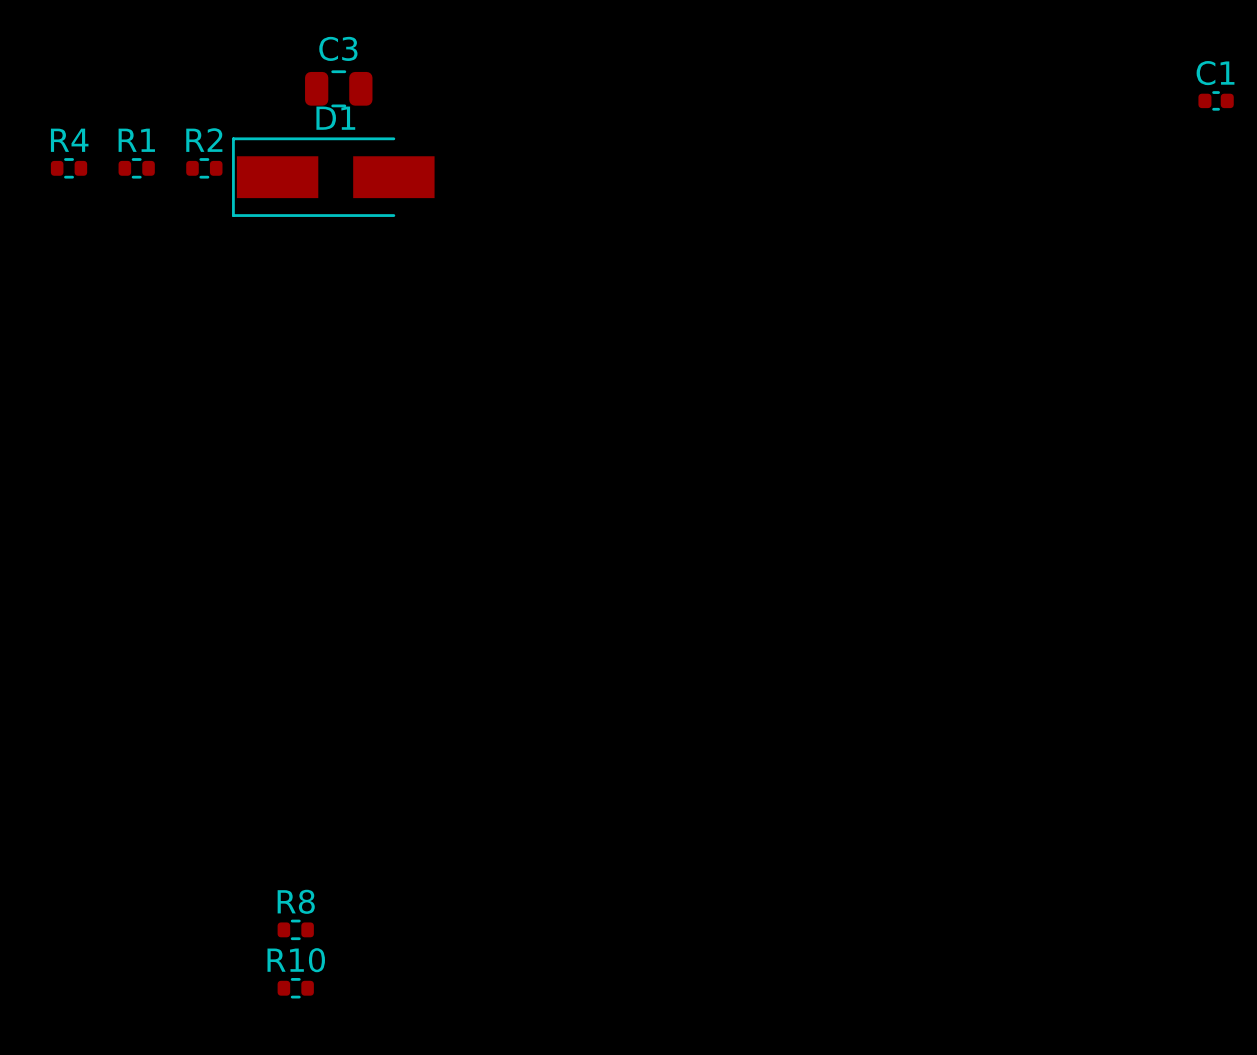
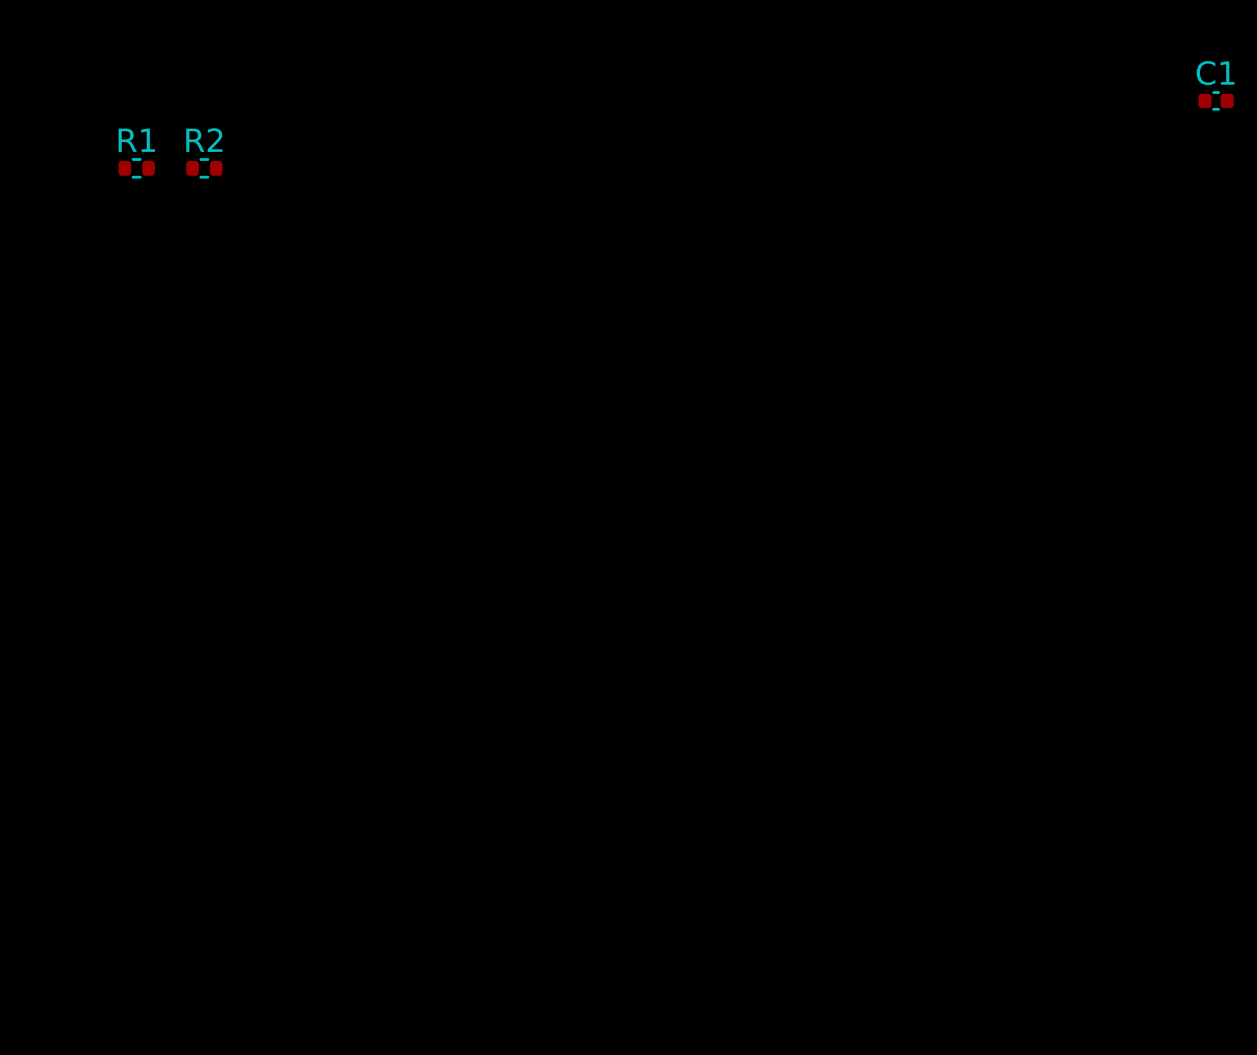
C3: (338, 88) -> none
R4: (69, 168) -> none
D1: (333, 177) -> none
R8: (295, 929) -> none
R10: (295, 988) -> none

